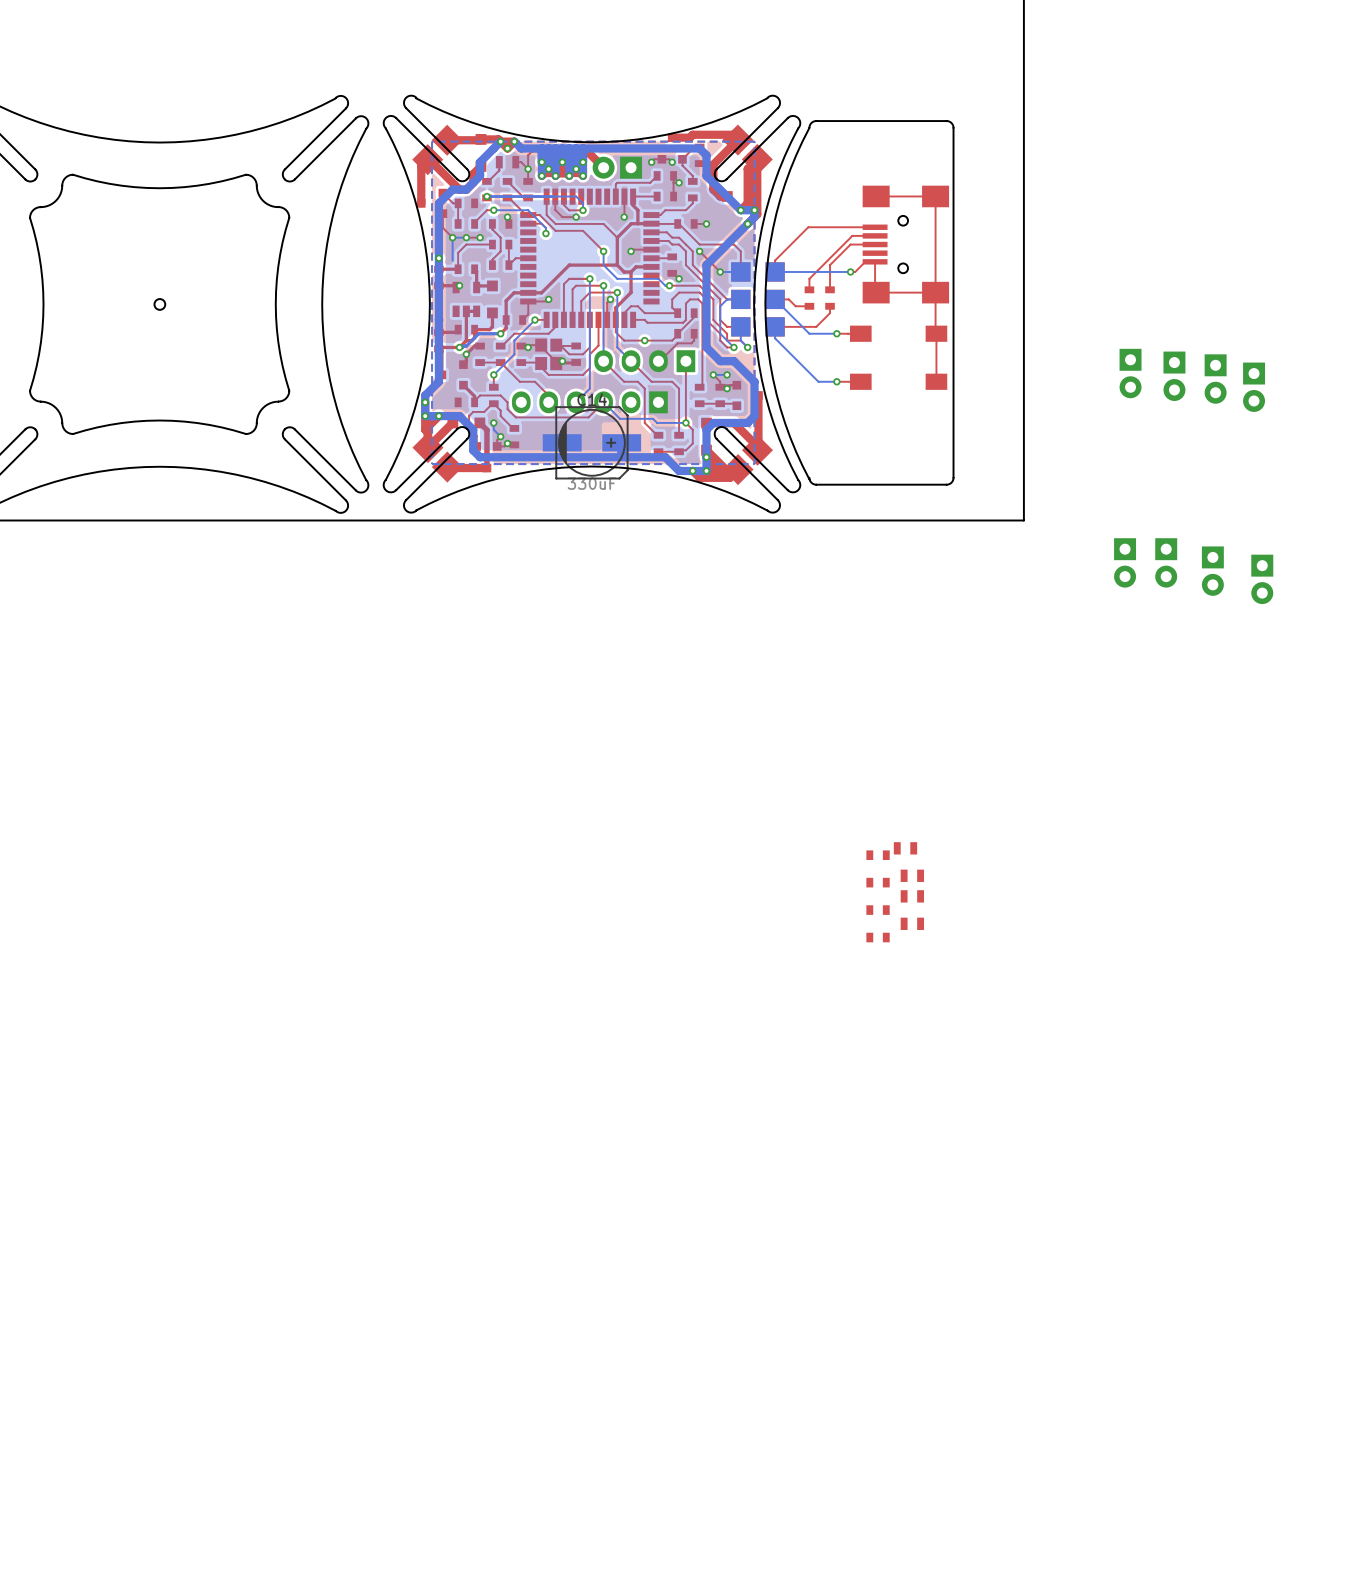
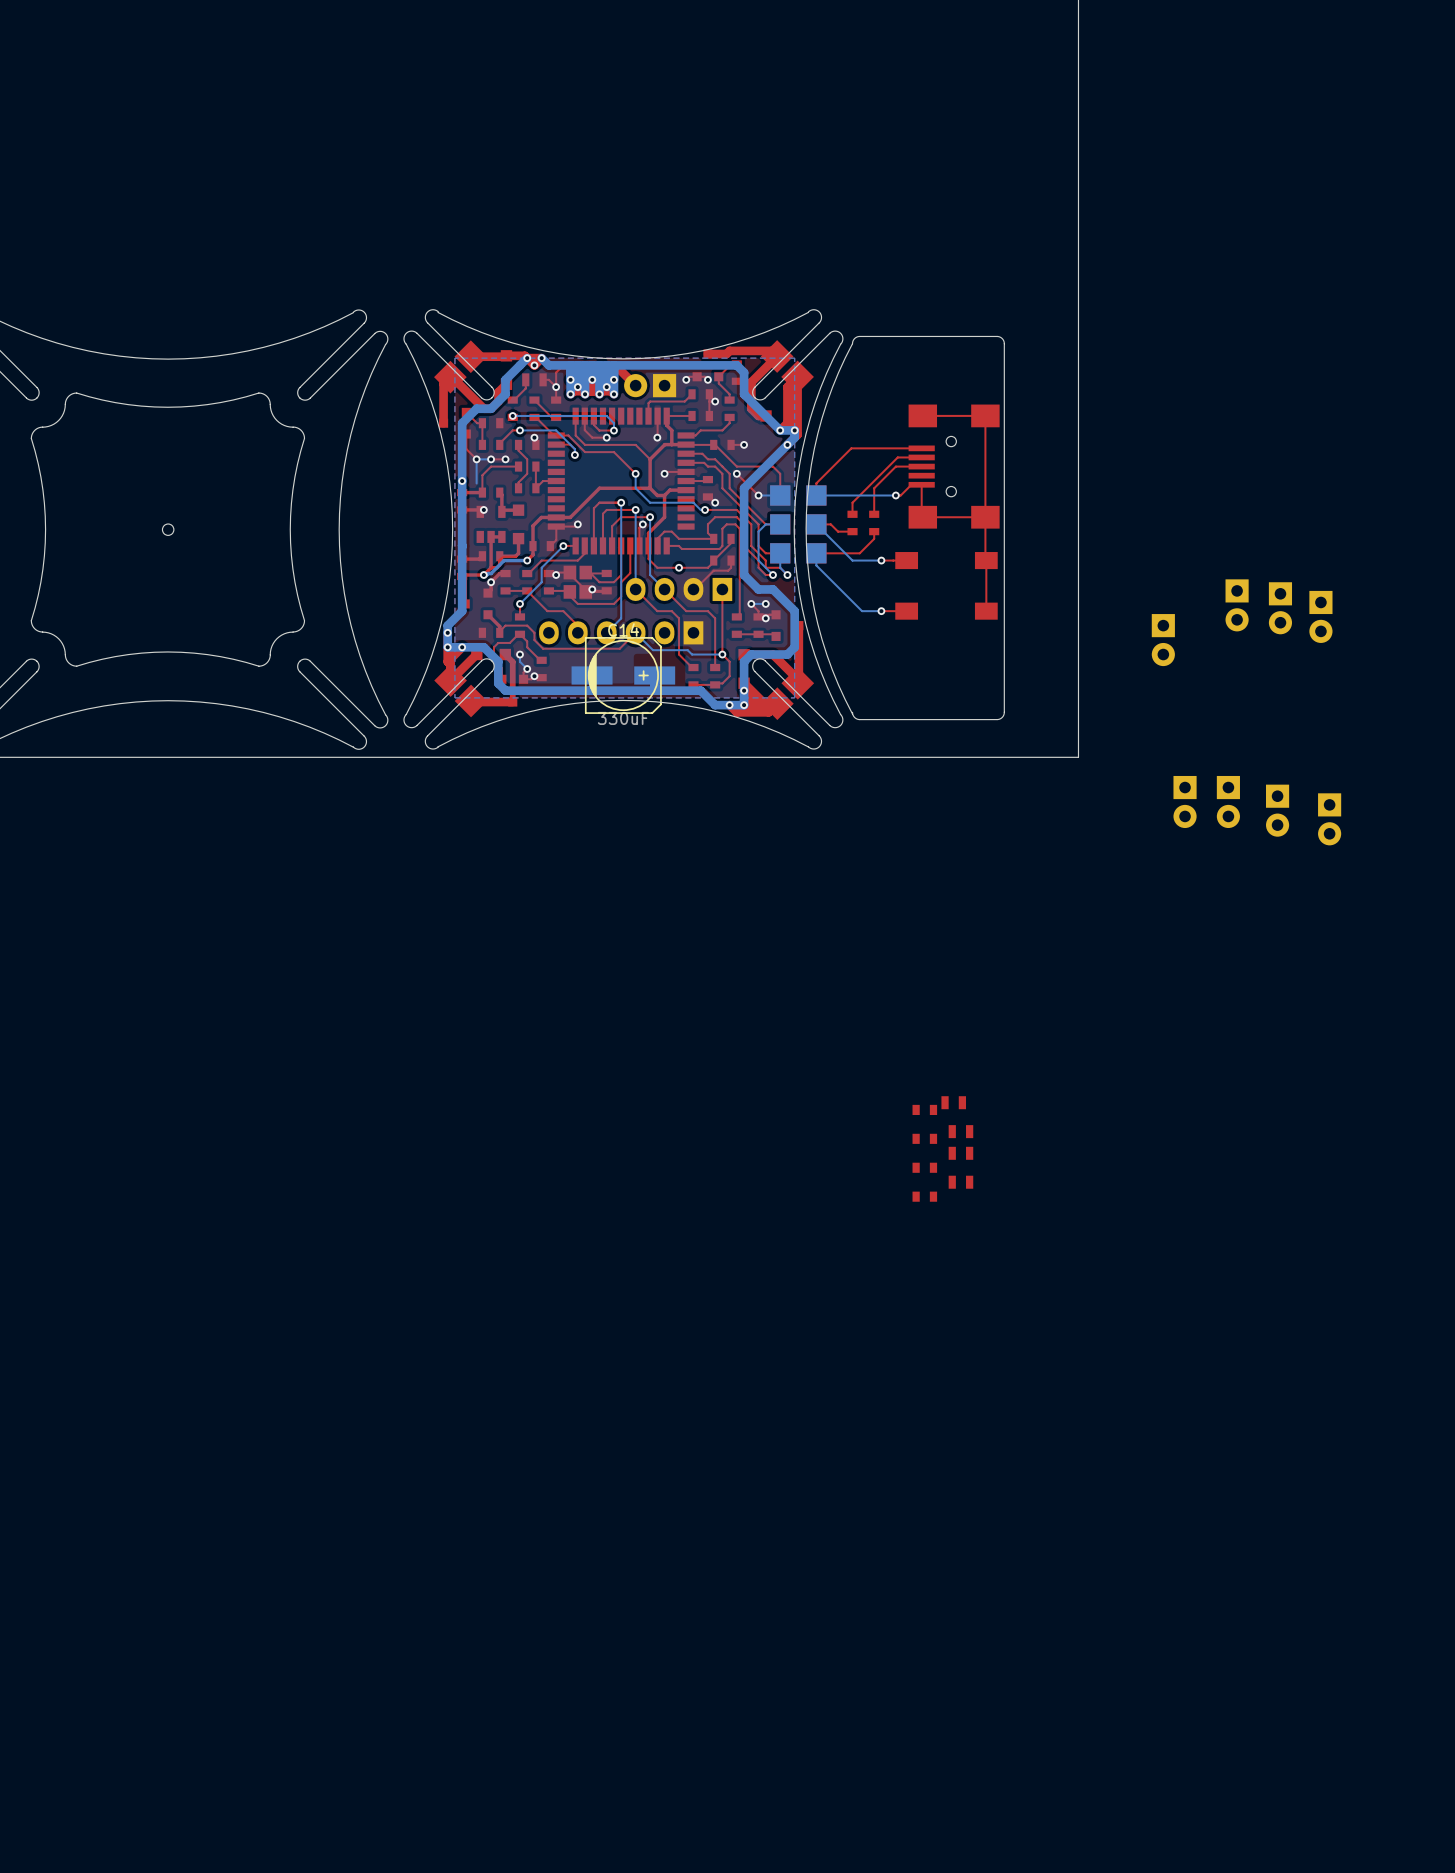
part position: (1130, 373) -> (1163, 640)

